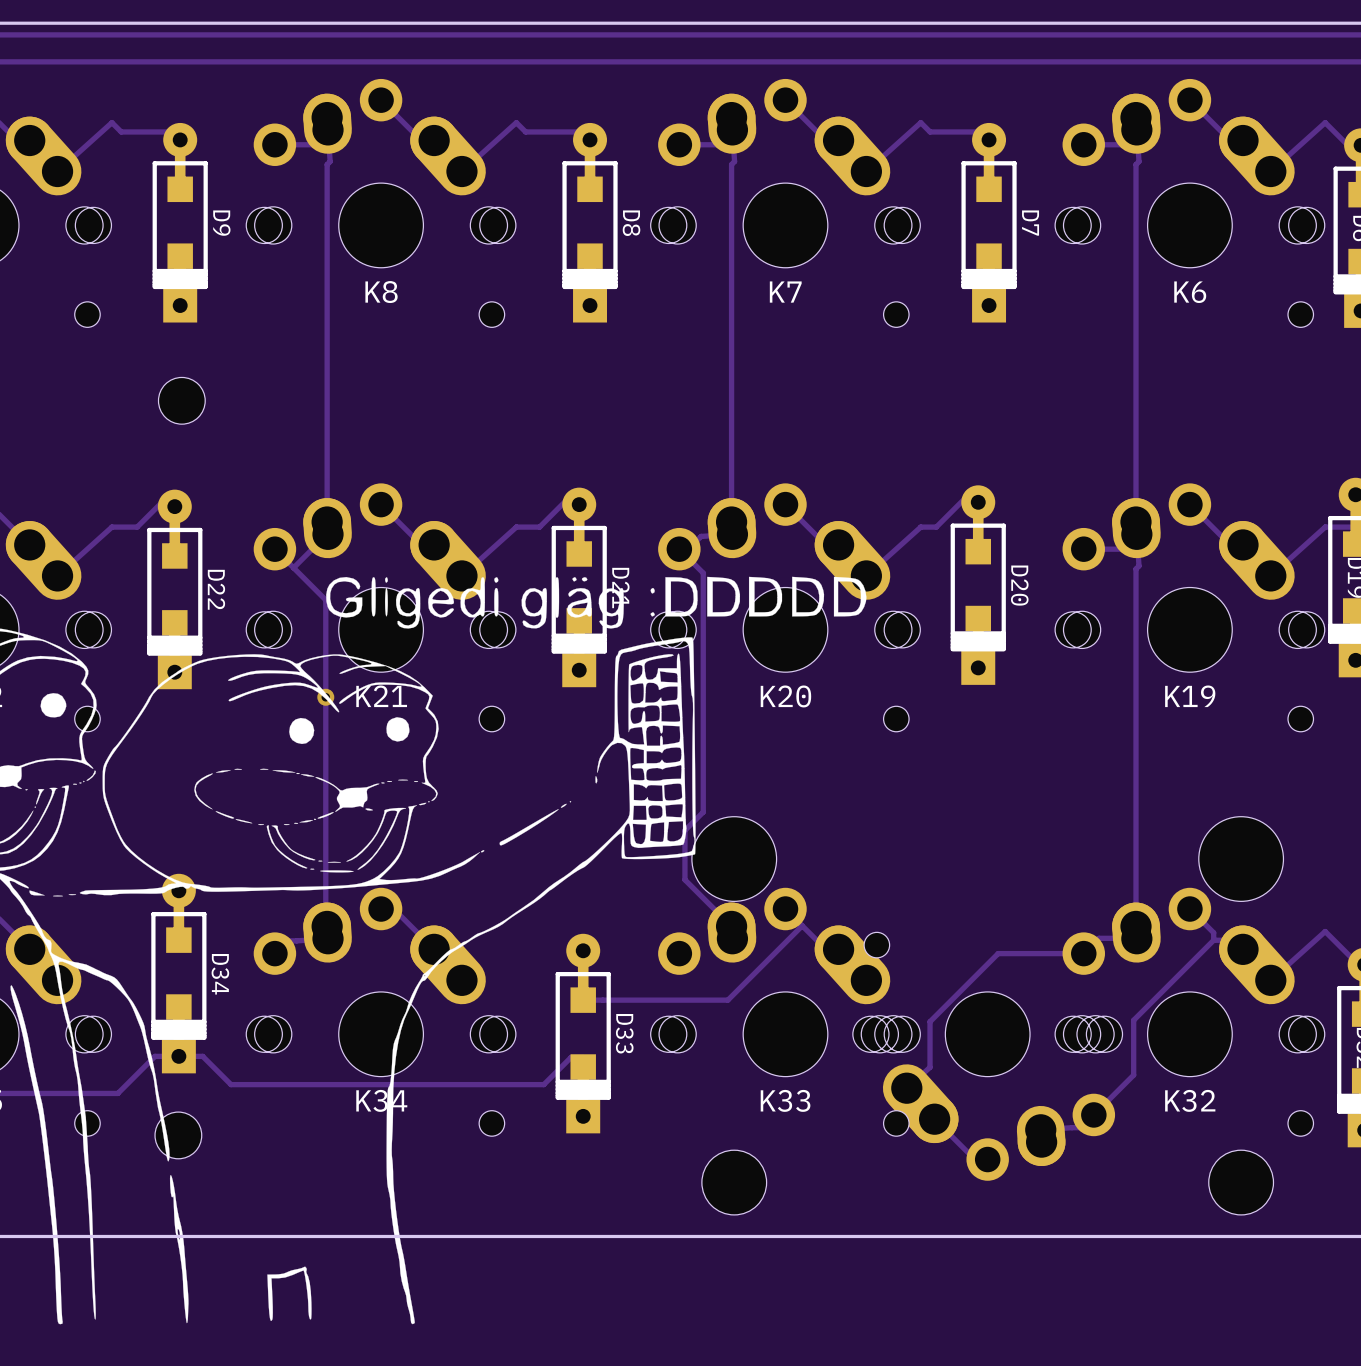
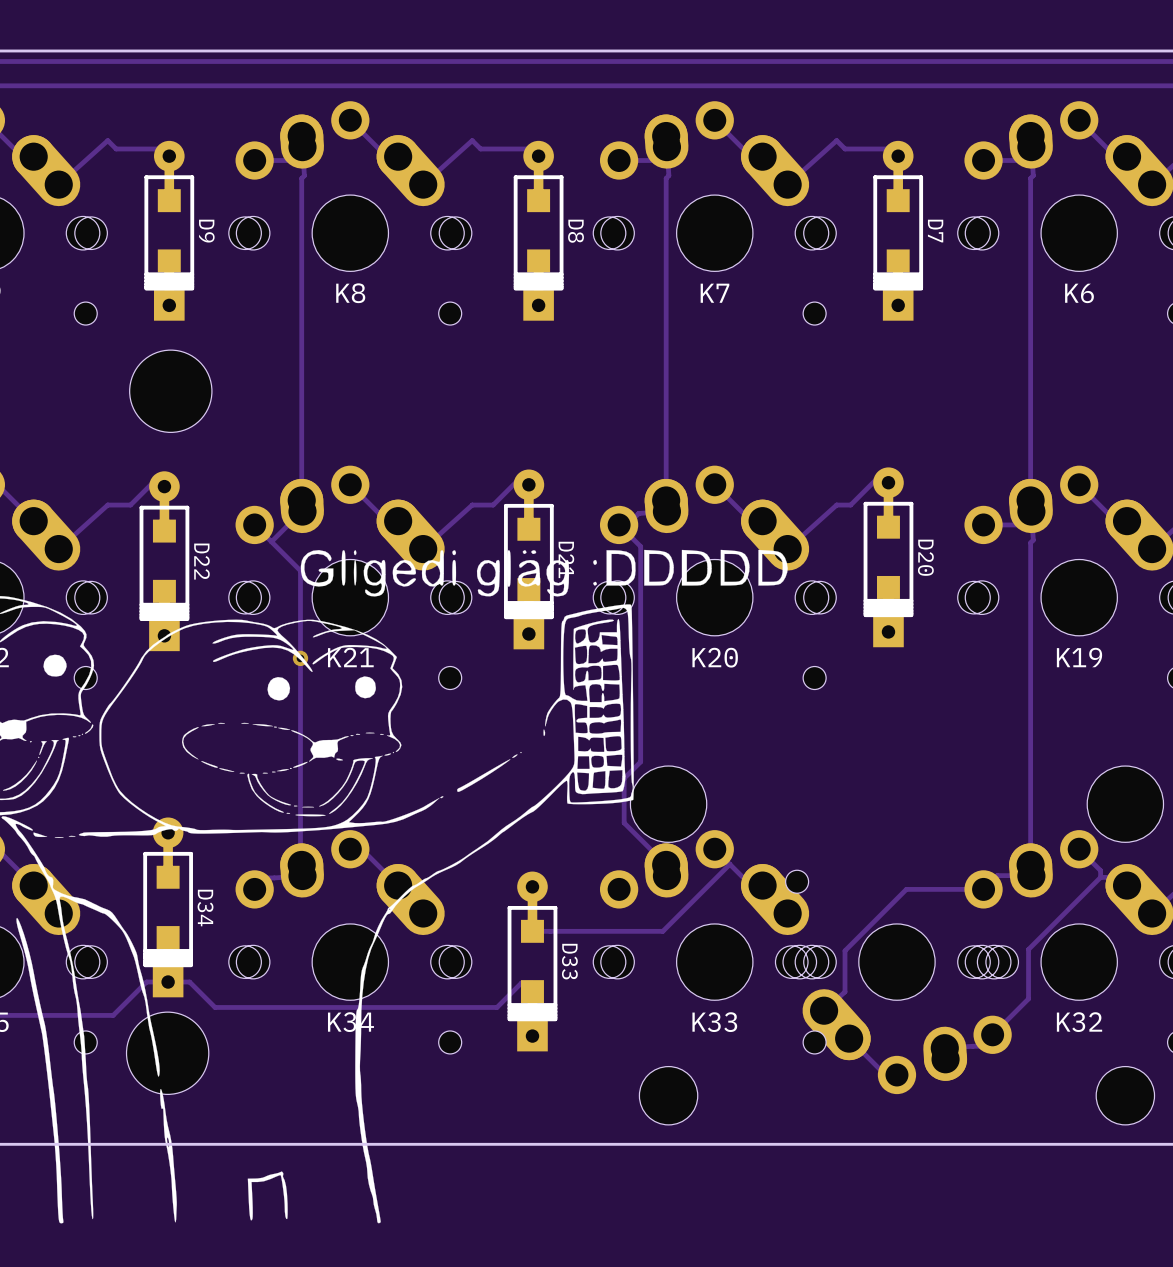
part footprint: [158, 377, 206, 425] -> [129, 350, 212, 433]
part footprint: [155, 1112, 202, 1159] -> [126, 1012, 209, 1095]

